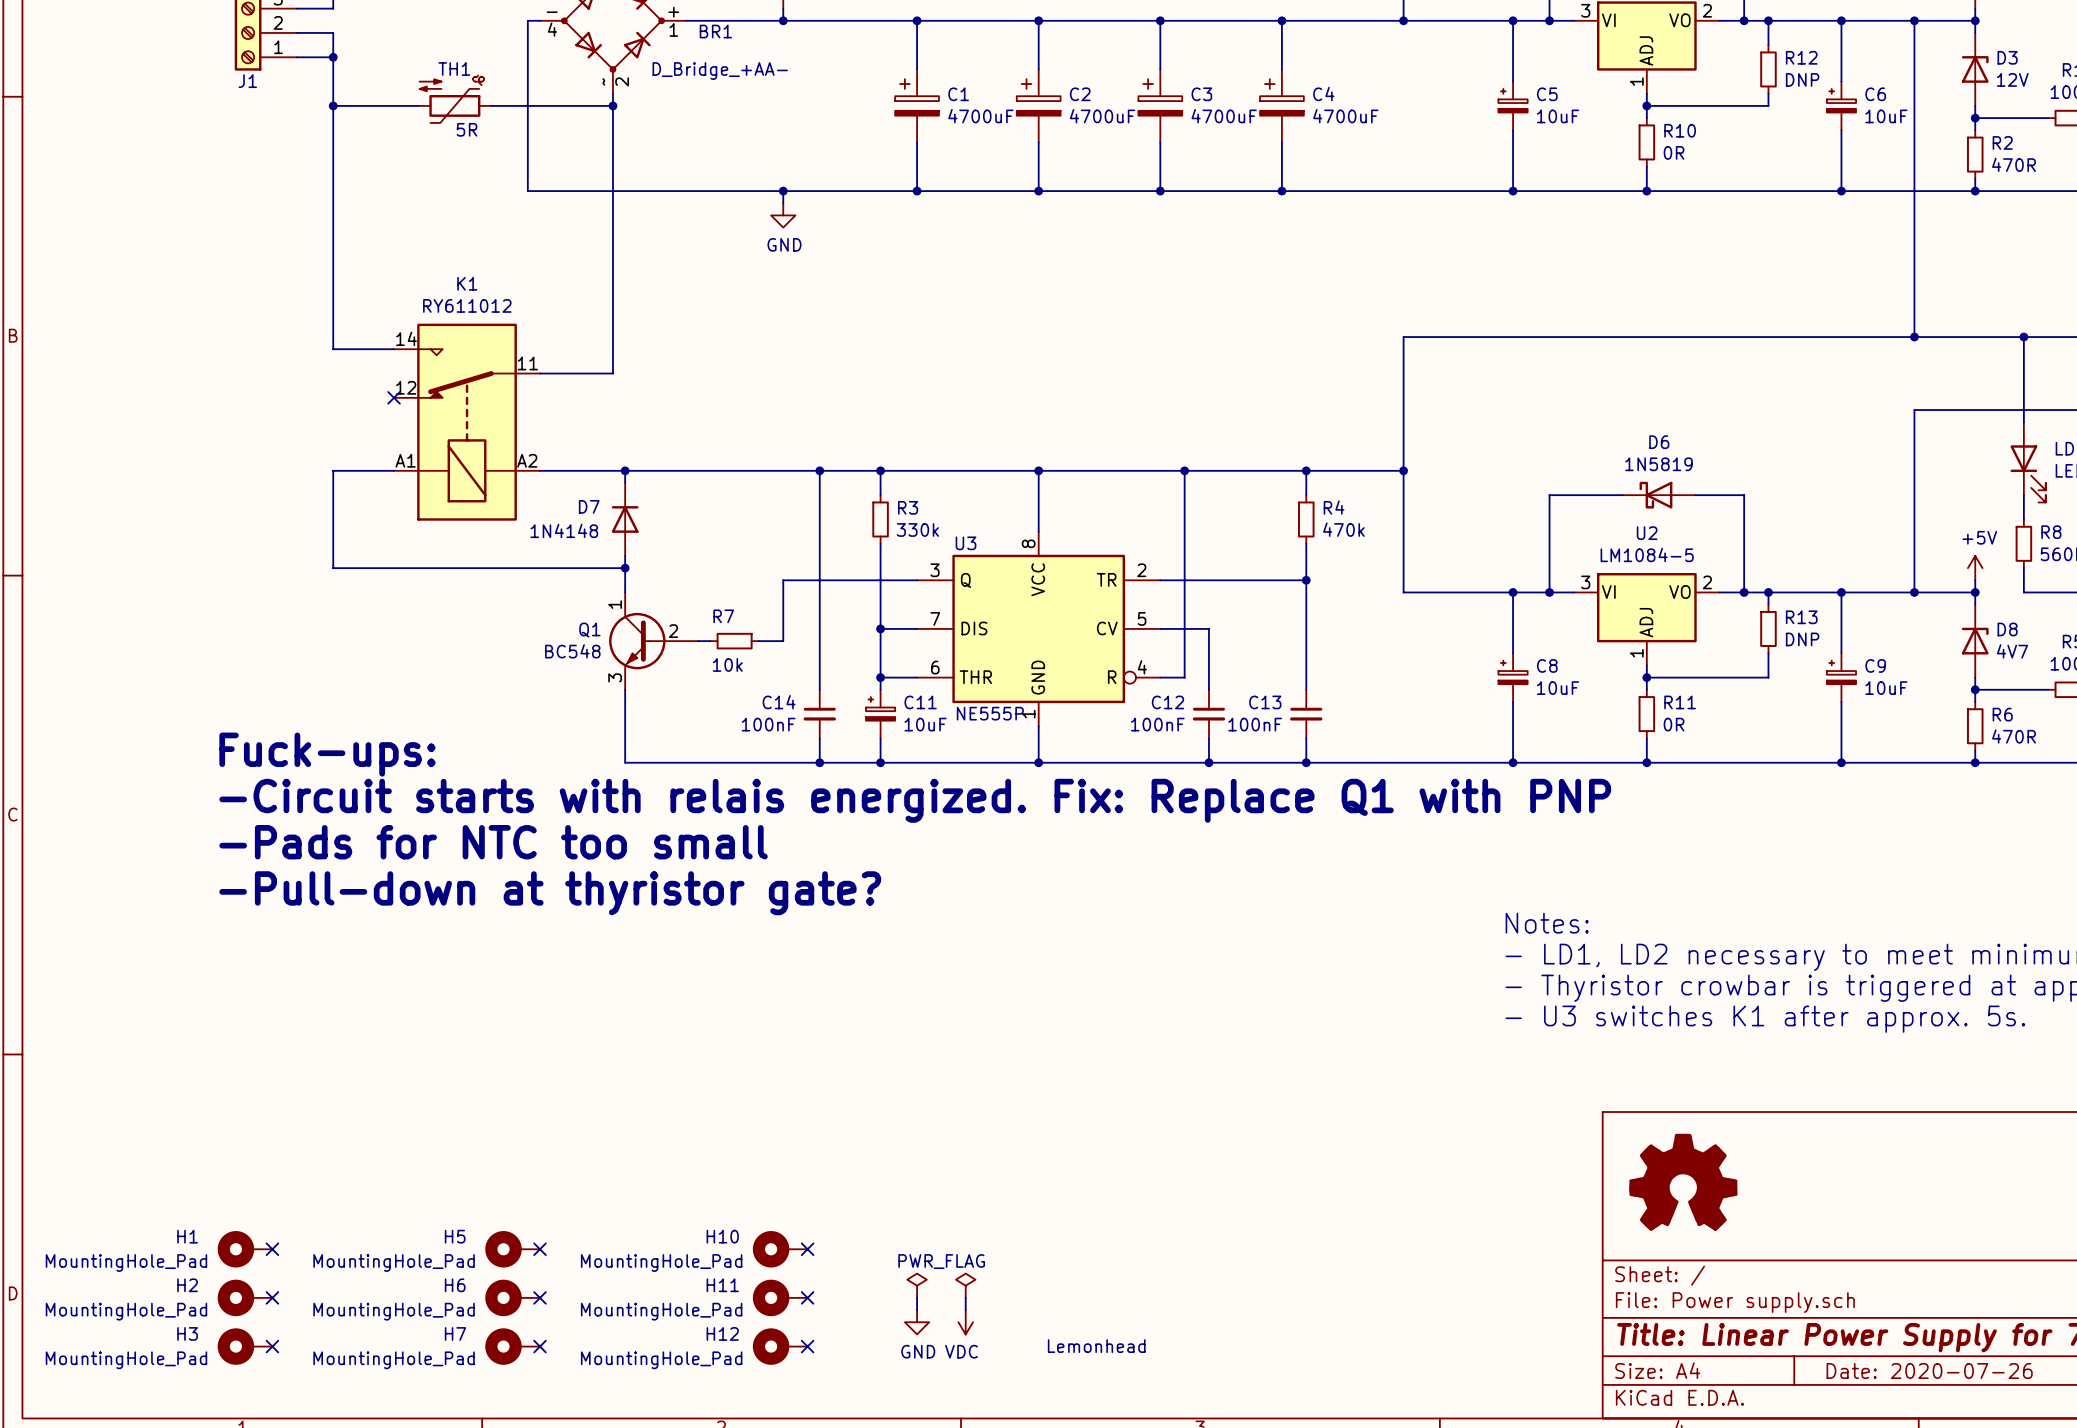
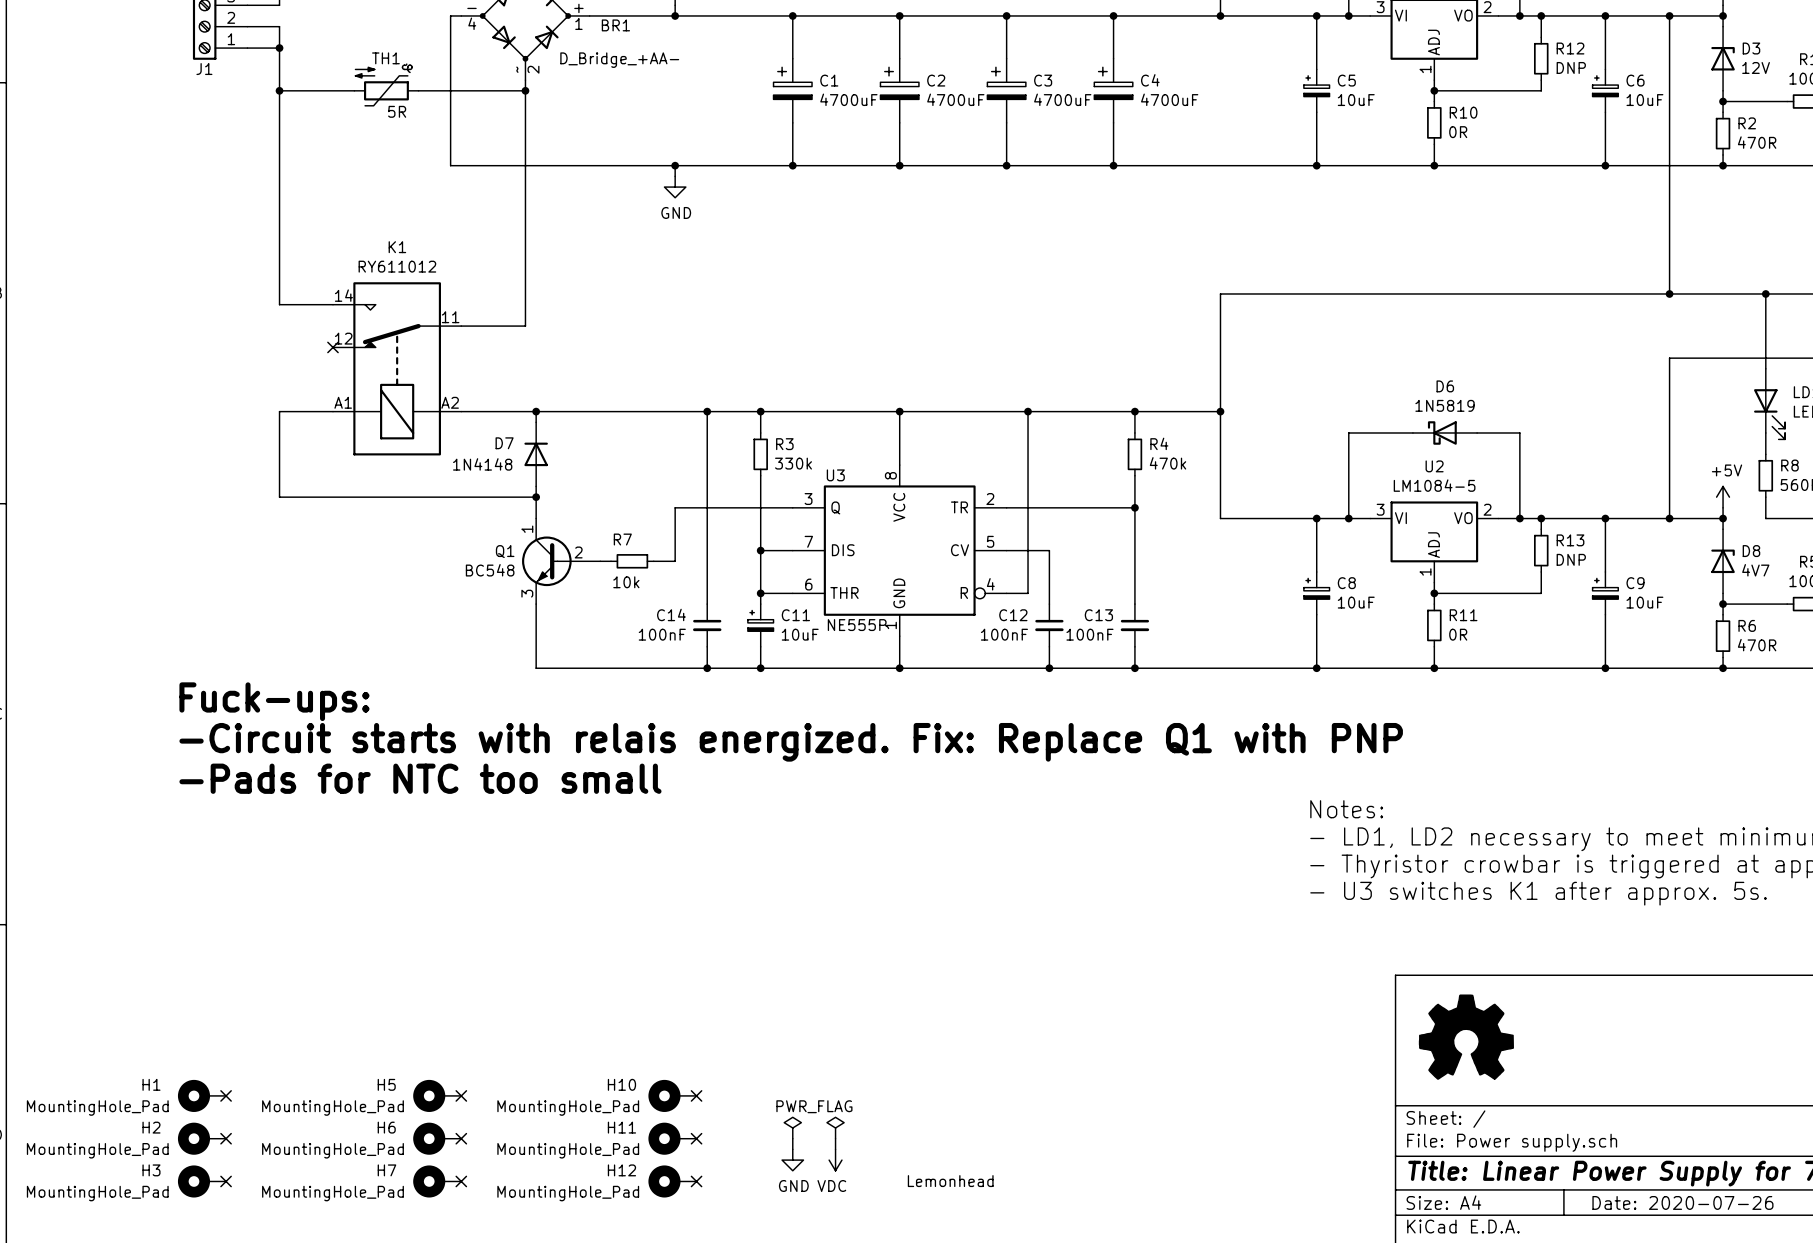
text: Fuck-ups: (327, 754) -> none
text: -Circuit starts with relais energized. Fix: Replace Q1 with PNP (915, 800) -> Fuck-ups: (274, 701)
text: -Pads for NTC too small (493, 842) -> -Circuit starts with relais energized. Fix: Replace Q1 with PNP (791, 742)
text: -Pull-down at thyristor gate? (550, 893) -> -Pads for NTC too small (420, 778)

